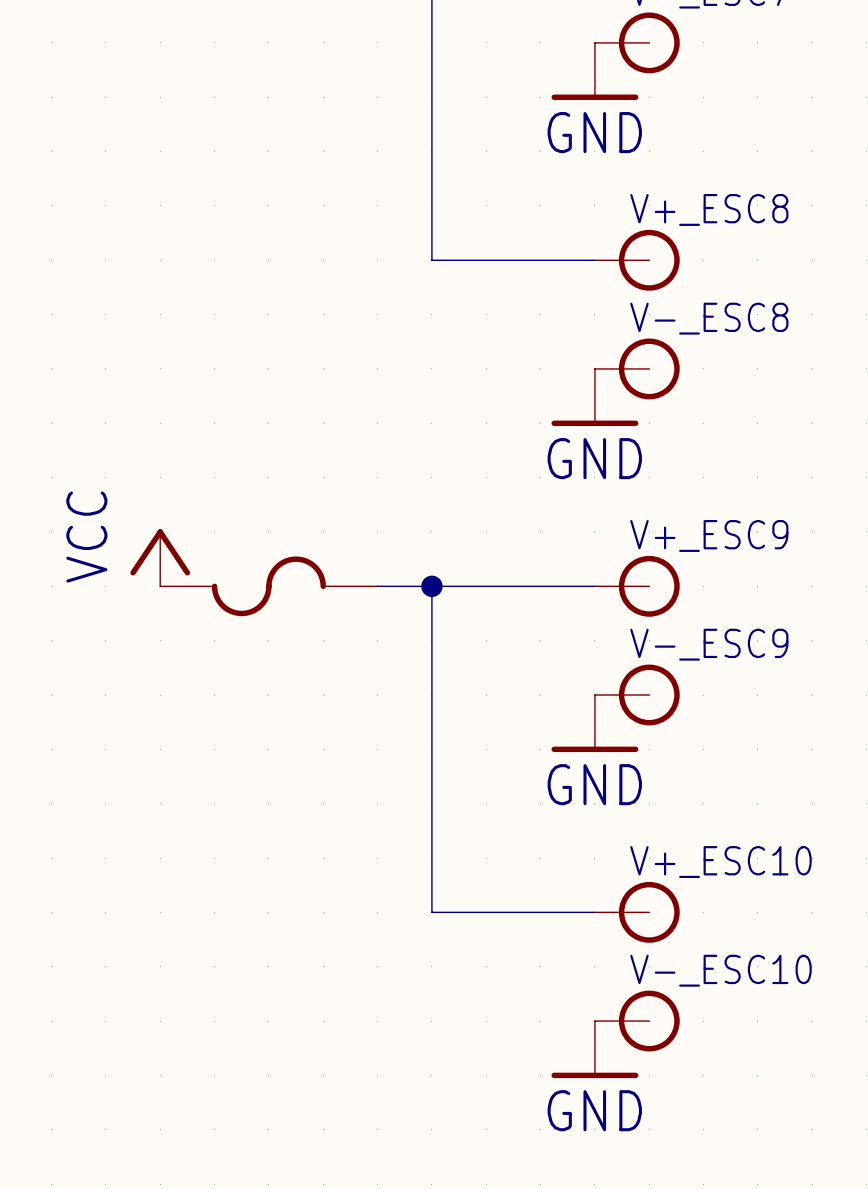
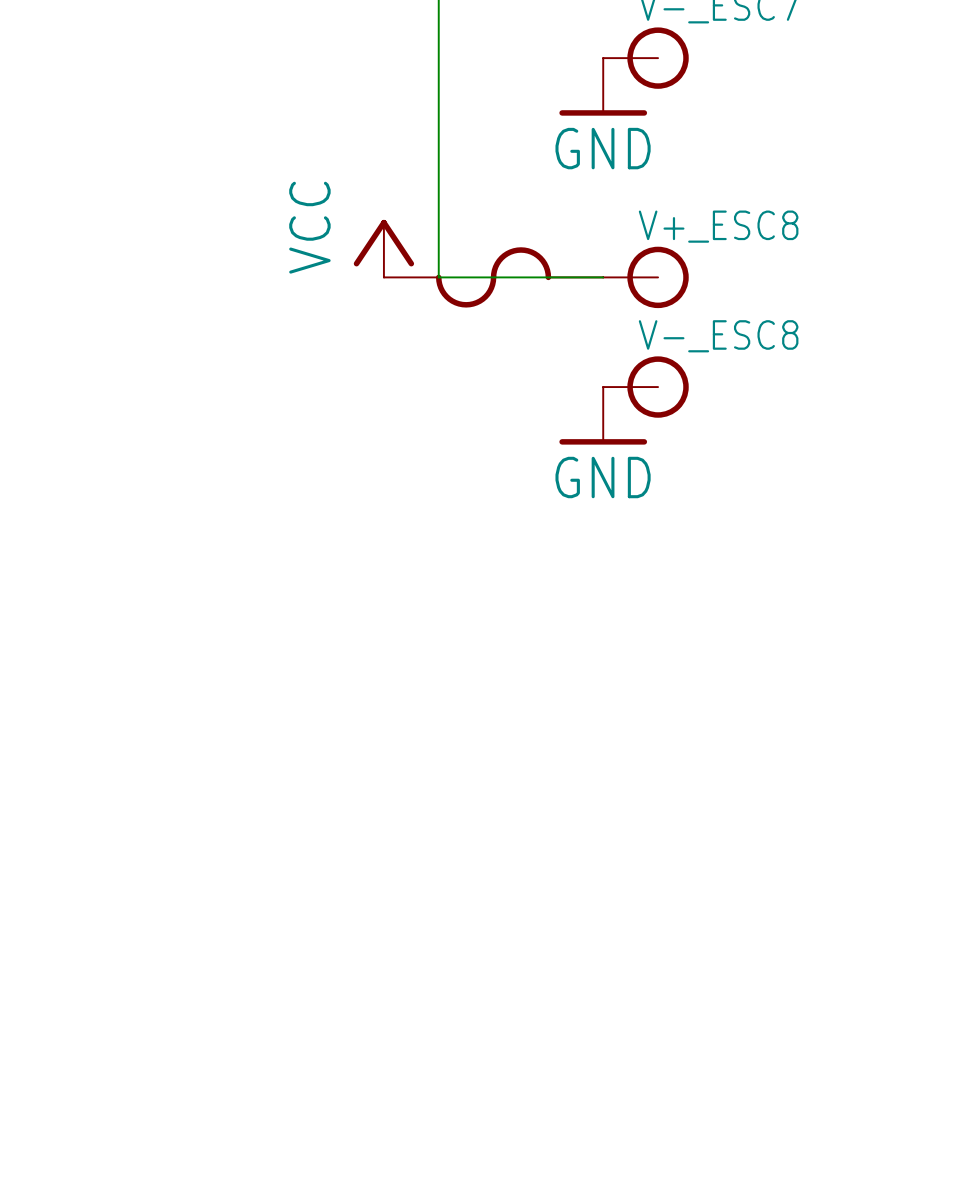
power symbol: none -> VCC (383, 248)
part: none -> (493, 277)
power symbol: VCC (160, 557) -> none
part: (268, 586) -> none
wire: (377, 586) (594, 586) -> none
wire: (431, 586) (431, 912) (594, 912) -> none
junction: (431, 586) -> none
V+_ESC9: (637, 586) -> none
V-_ESC9: (637, 695) -> none
power symbol: GND (594, 723) -> none
V+_ESC10: (637, 912) -> none
V-_ESC10: (637, 1021) -> none
power symbol: GND (594, 1049) -> none

